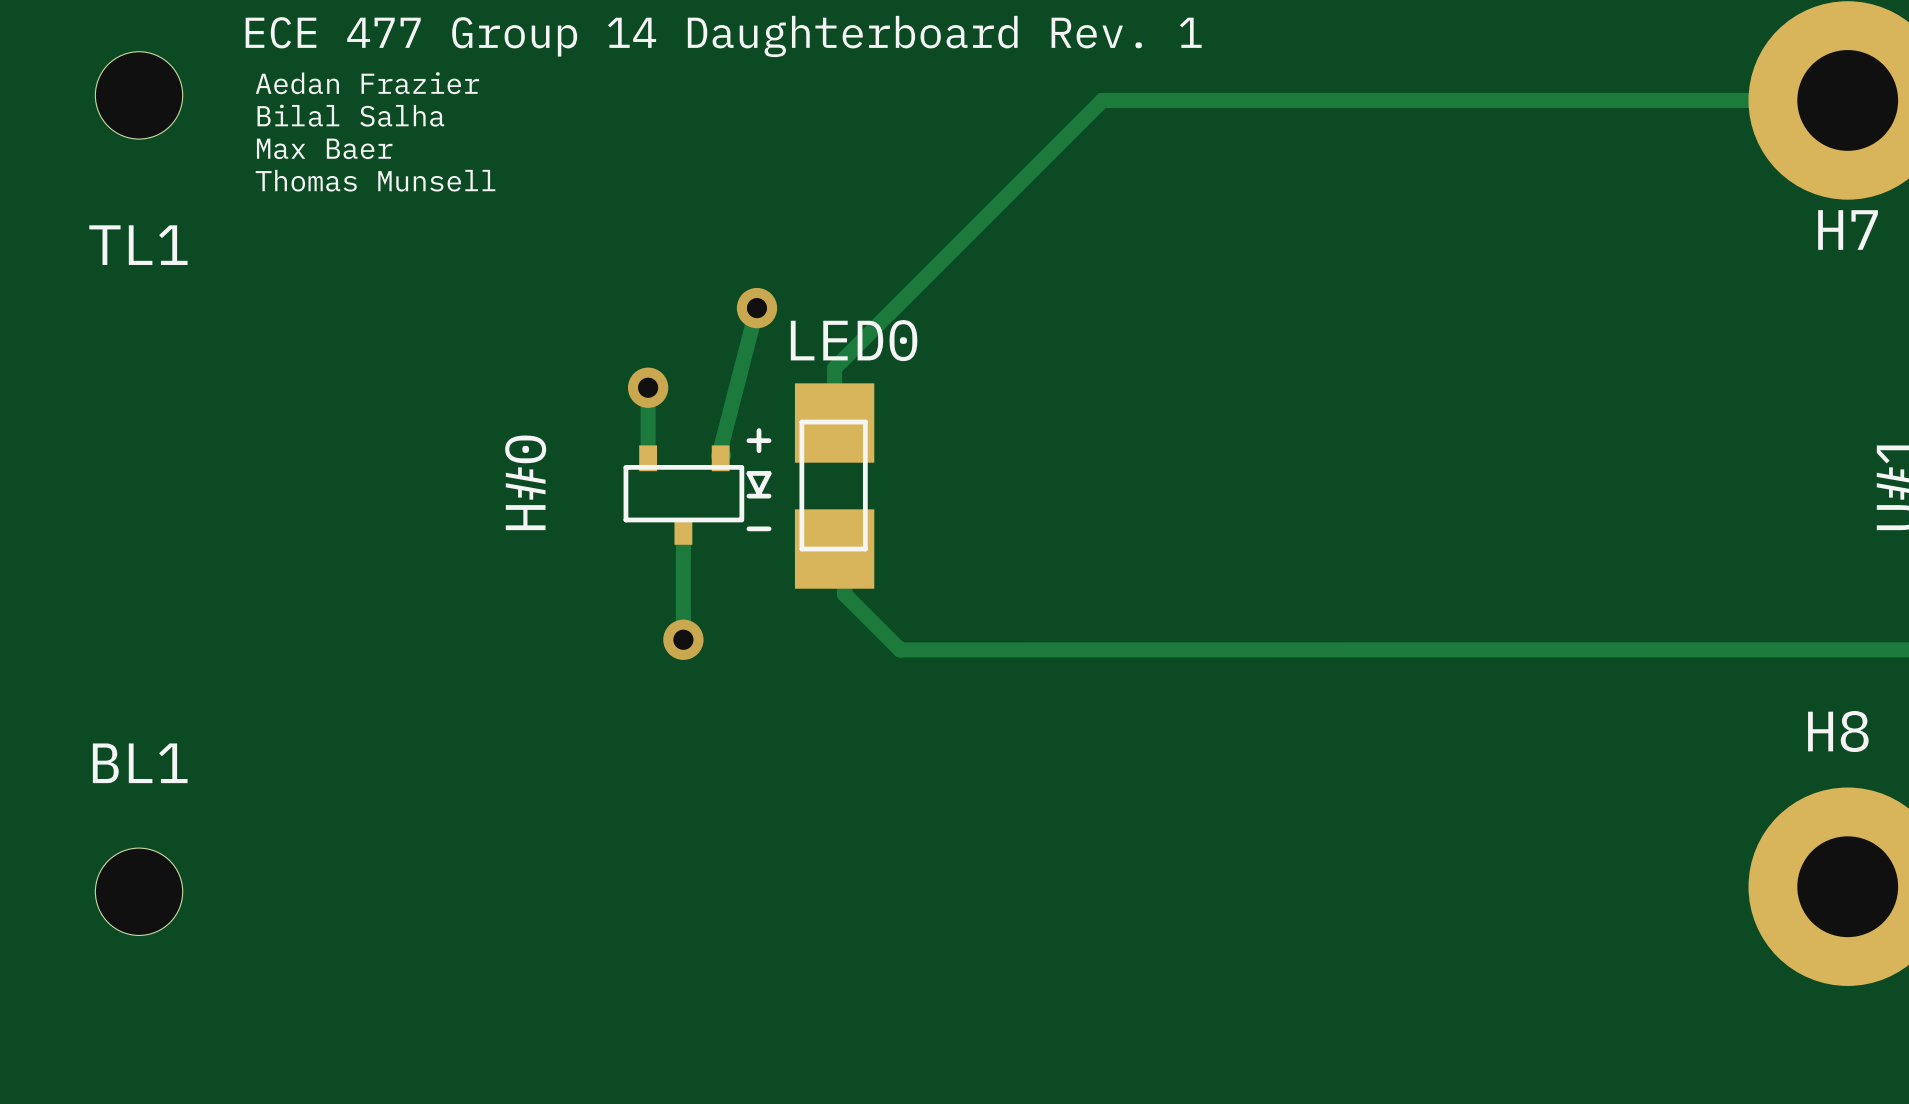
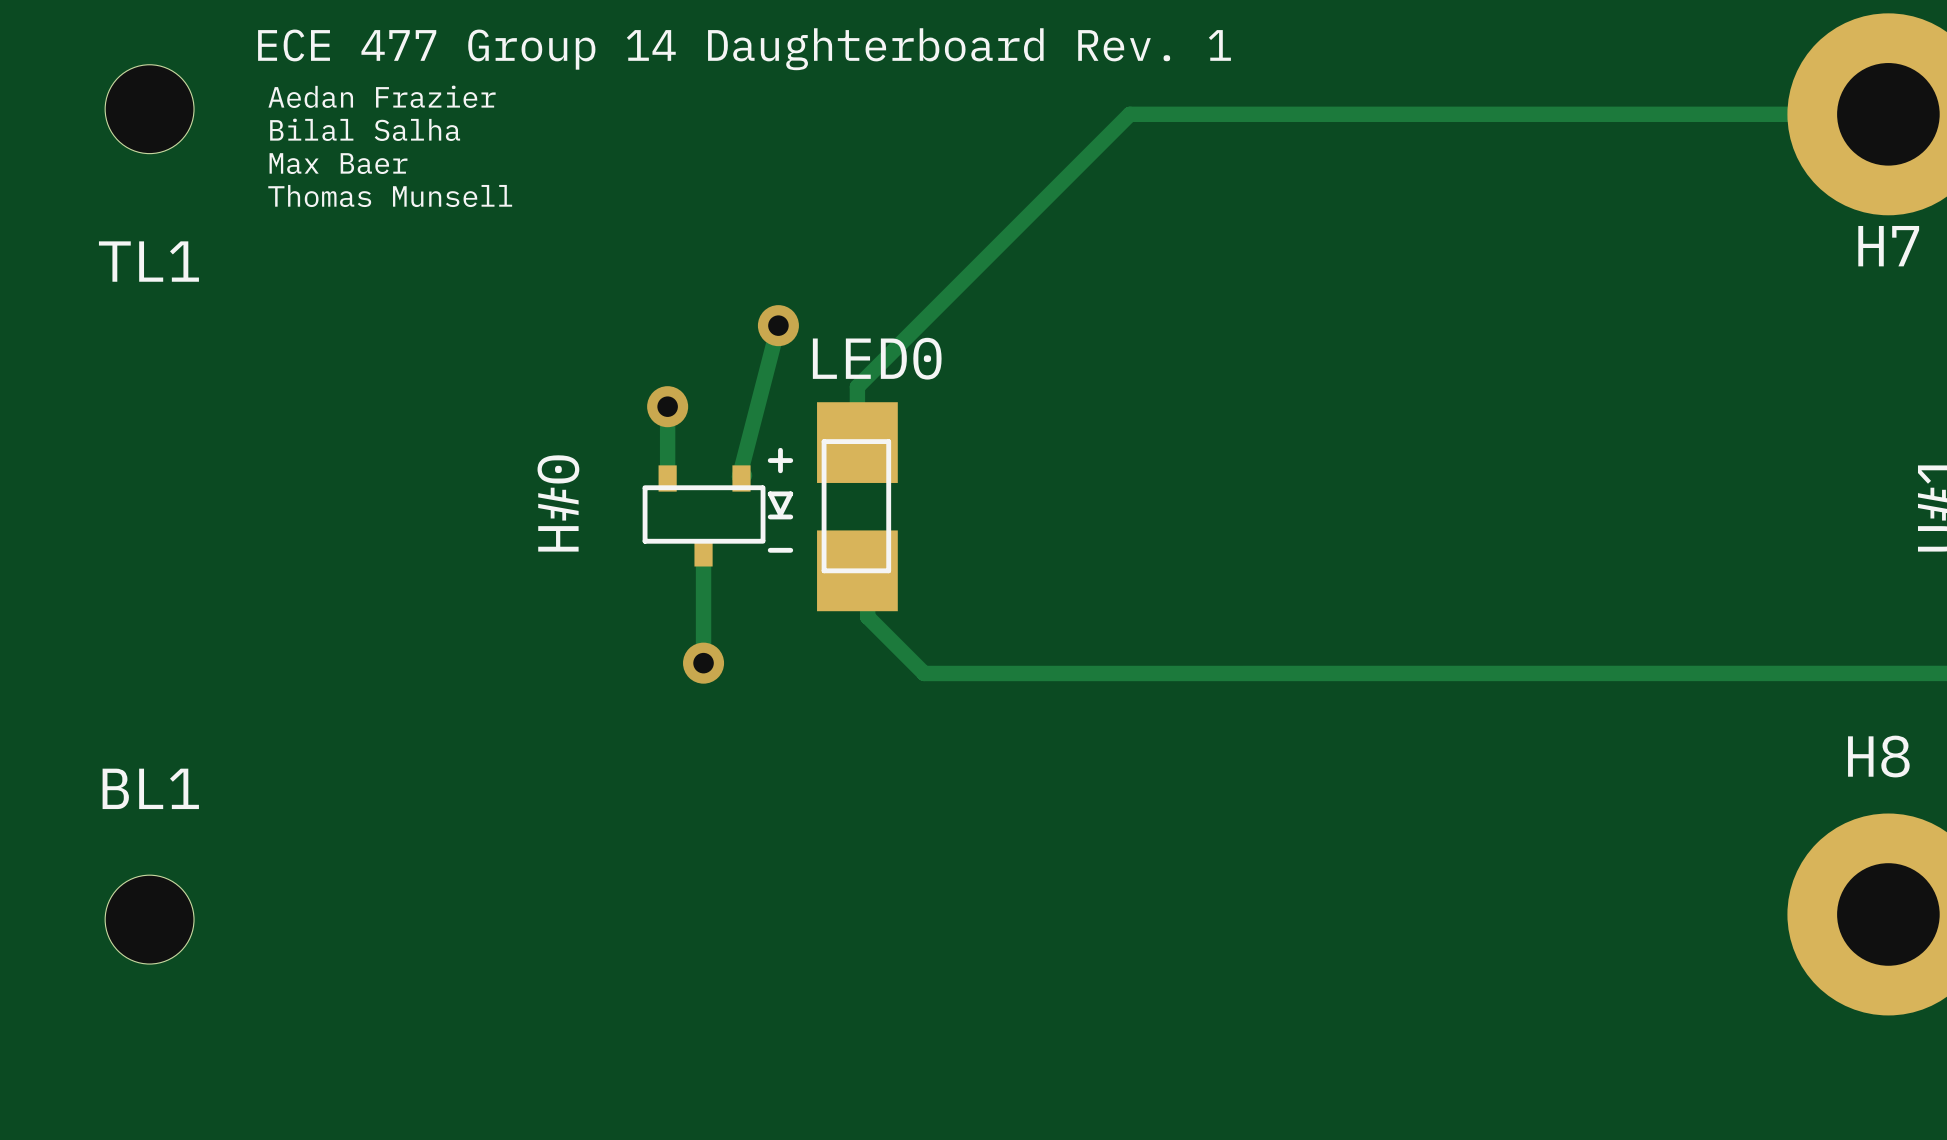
H#0 name position: H#0 (525, 482) -> H#0 (558, 503)

